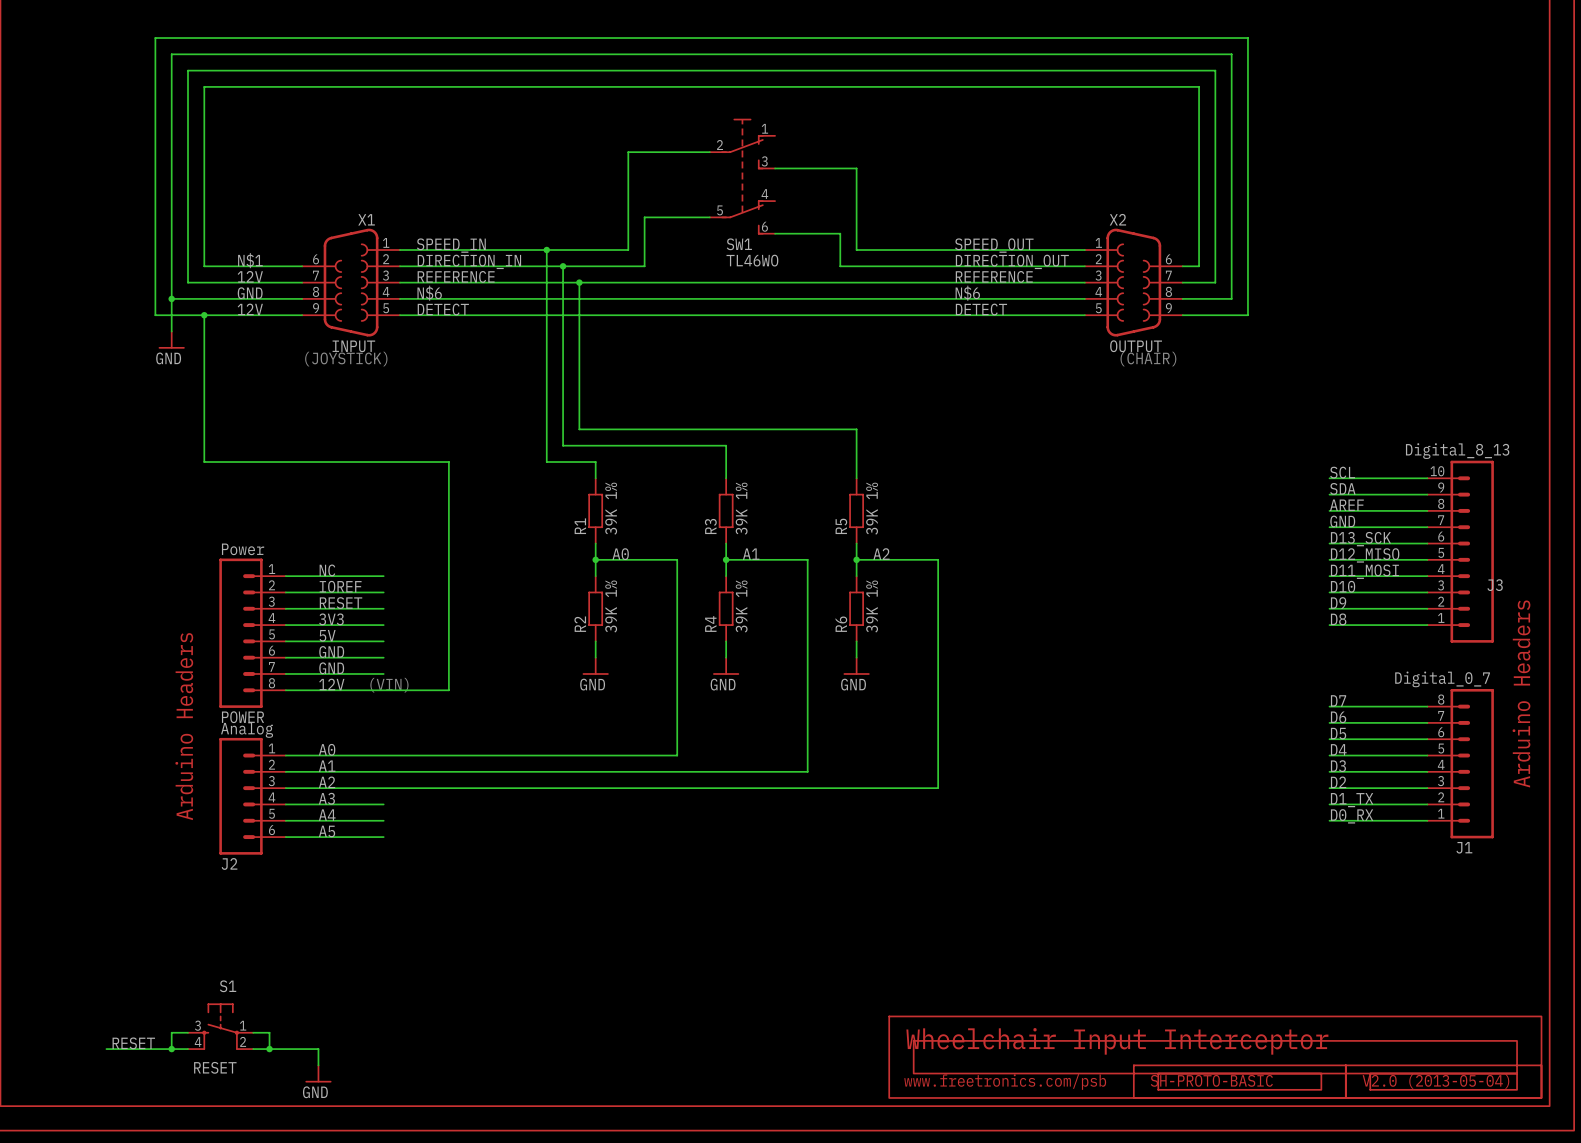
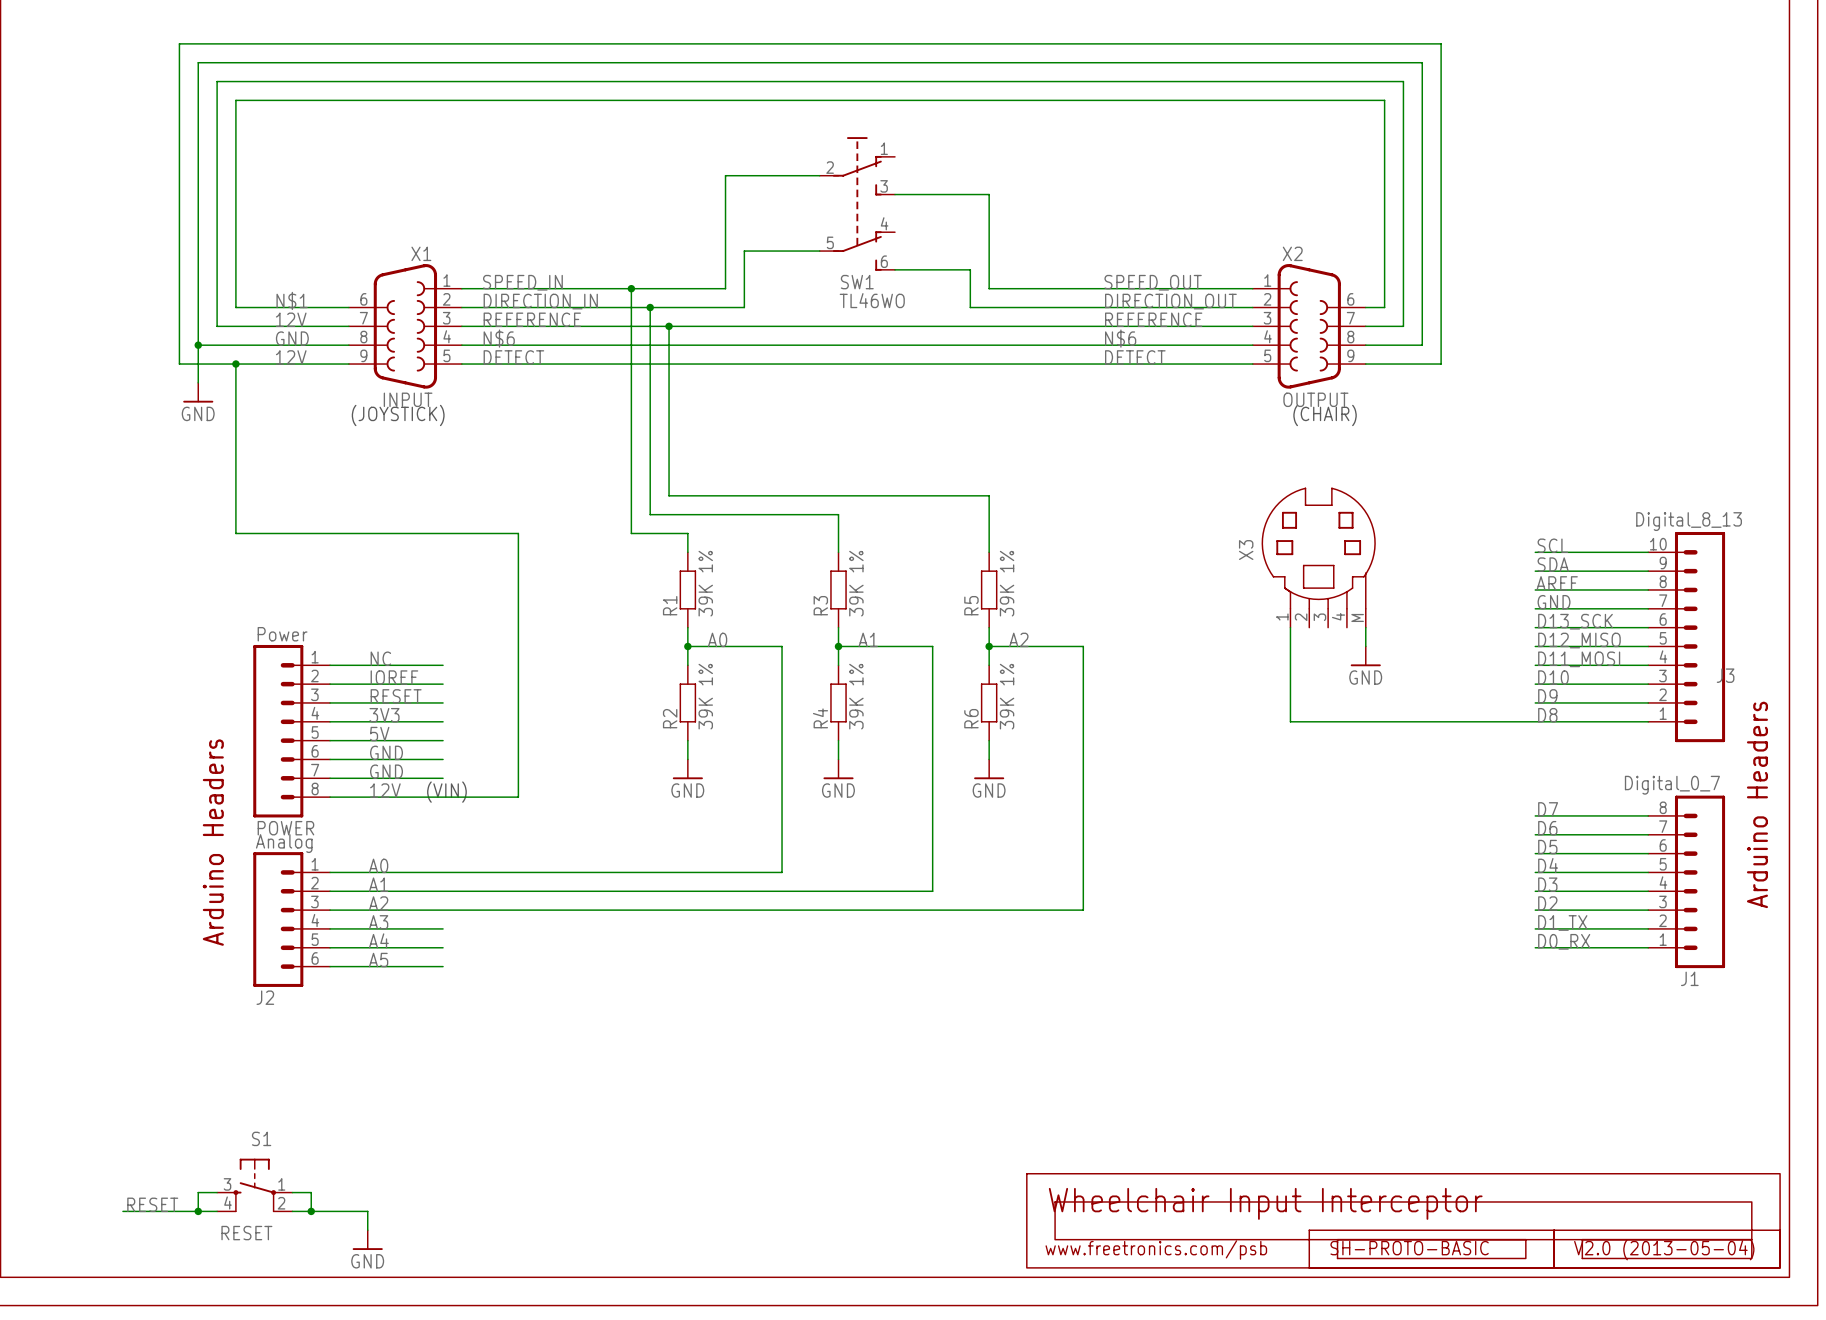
X3: none -> (1318, 557)
wire: none -> (1290, 627) (1290, 721) (1535, 721)
wire: none -> (1365, 627) (1365, 646)
power symbol: none -> GND (1365, 656)

